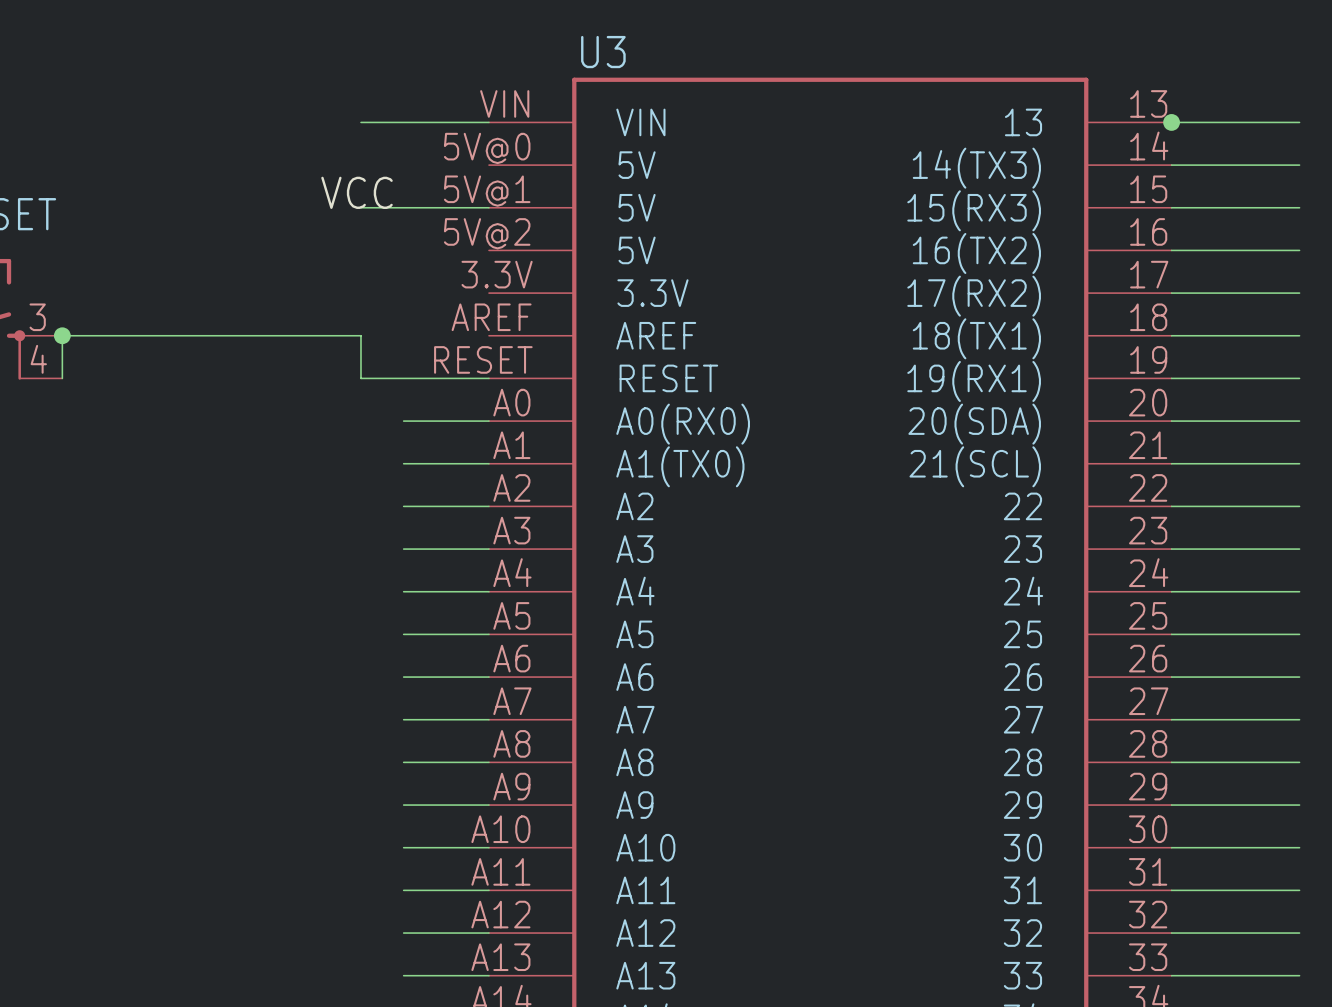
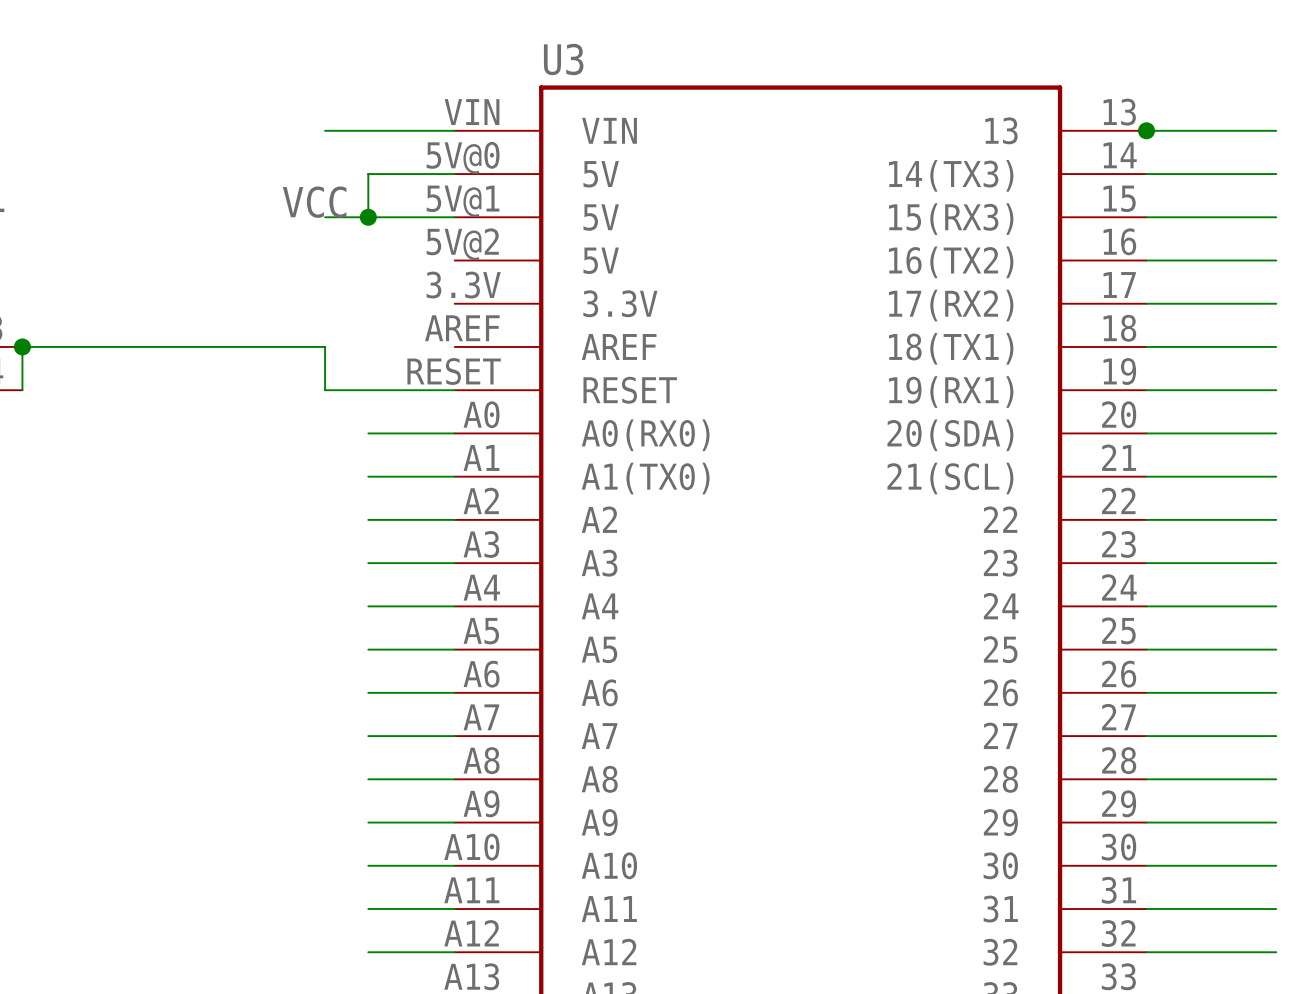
wire: none -> (454, 174) (368, 174) (368, 217)
junction: none -> (368, 217)

